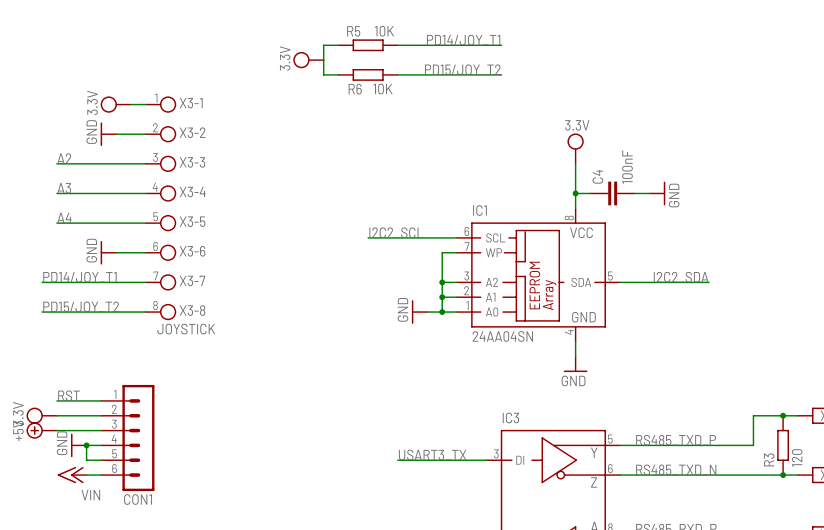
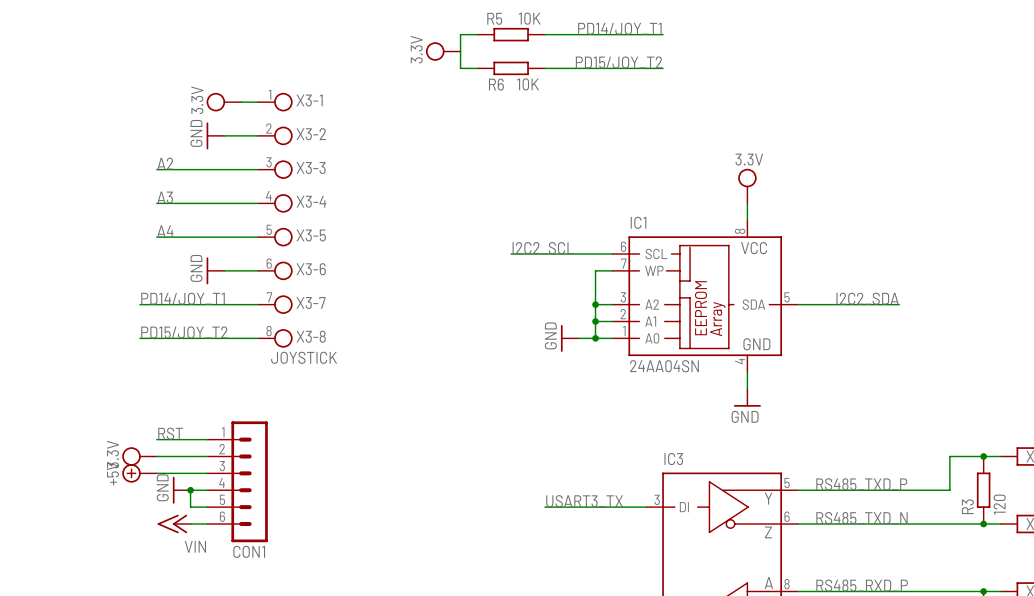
power symbol position: 3.3V (575, 148) -> 3.3V (747, 186)
wire: (575, 163) (575, 193) (590, 193) -> none
junction: (575, 193) -> none
C4: 100nF (612, 193) -> none
wire: (634, 193) (649, 193) -> none
power symbol: GND (657, 193) -> none

